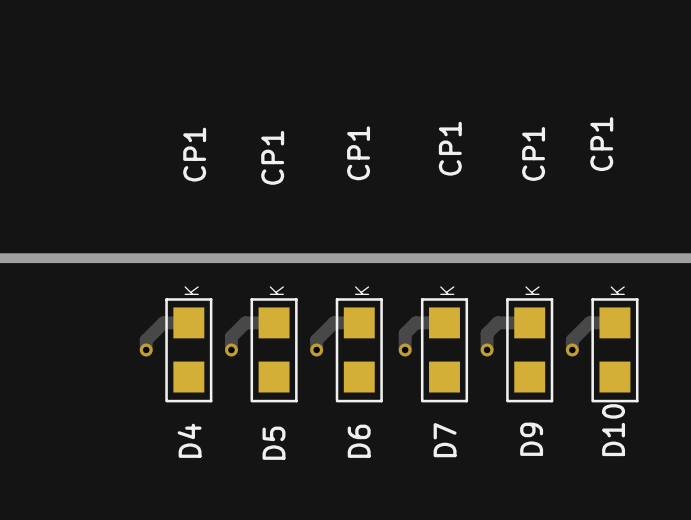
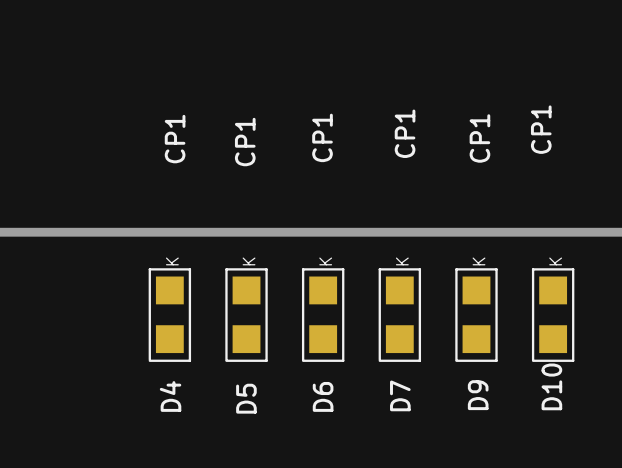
track: (188, 322) (163, 322) (146, 340) (146, 349) -> none
track: (274, 322) (245, 322) (231, 336) (231, 349) -> none
track: (359, 322) (333, 322) (316, 340) (316, 349) -> none
track: (444, 322) (415, 322) (405, 333) (405, 349) -> none
track: (529, 322) (497, 322) (487, 333) (487, 349) -> none
track: (614, 322) (589, 322) (572, 340) (572, 349) -> none
via: (146, 349) -> none
via: (231, 349) -> none
via: (316, 349) -> none
via: (405, 349) -> none
via: (487, 349) -> none
via: (572, 349) -> none

